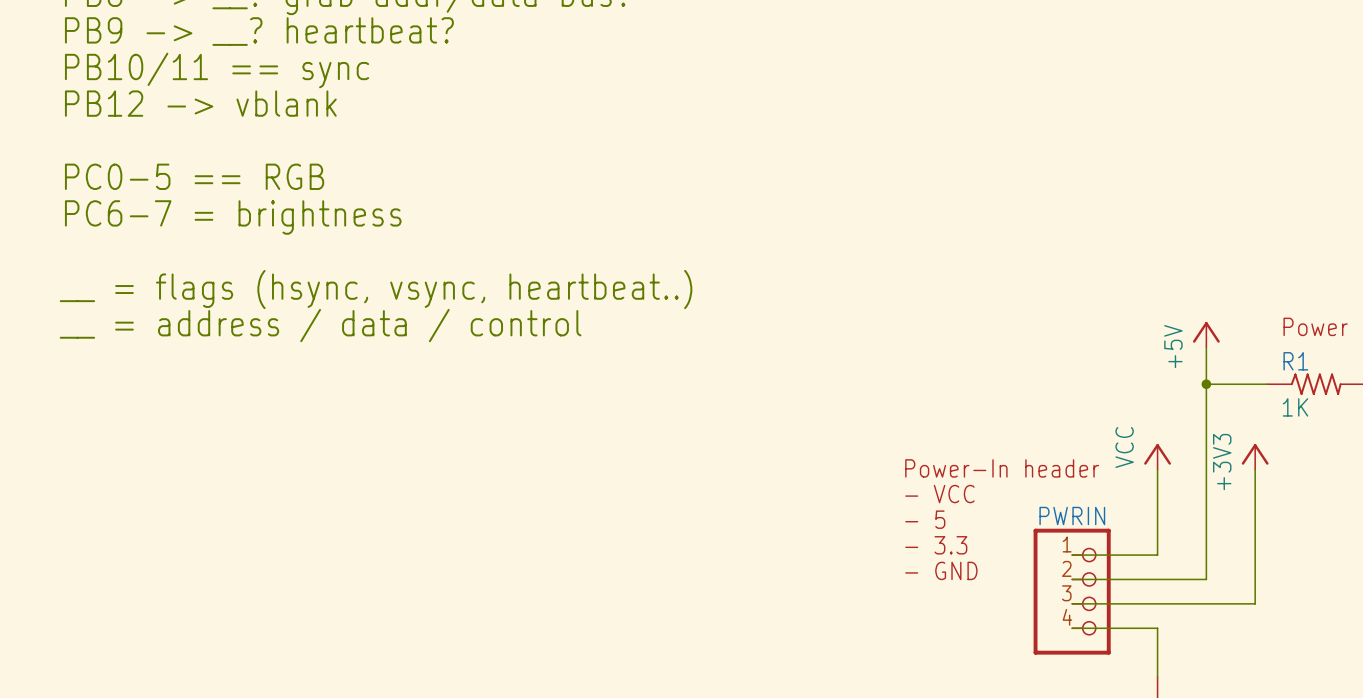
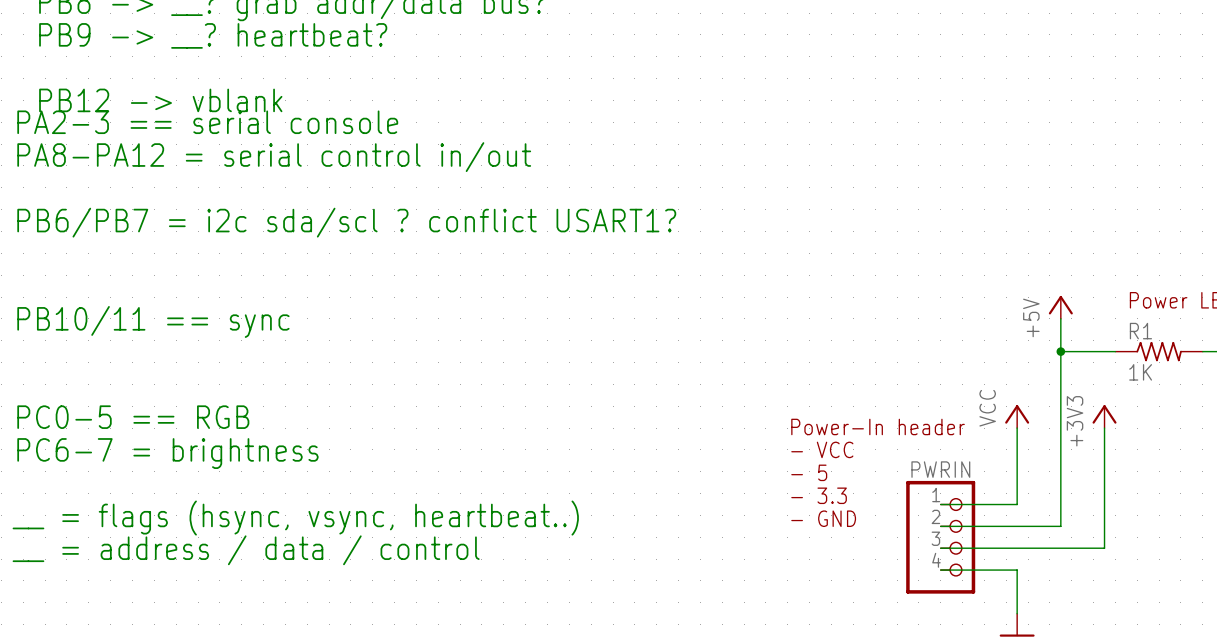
text: PB10/11 == sync (217, 70) -> none
text: none -> PA2-3 == serial console (207, 122)
text: none -> PA8-PA12 = serial control in/out (274, 157)
text: PC0-5 == RGB (194, 176) -> none
text: PC6-7 = brightness (233, 217) -> none
text: none -> PB6/PB7 = i2c sda/scl ? conflict USART1? (346, 222)
text: __ = flags (hsync, vsync, heartbeat..) (376, 289) -> none
text: __ = address / data / control (320, 325) -> none
text: none -> PB10/11 == sync (153, 321)
text: none -> PC0-5 == RGB (133, 417)
text: none -> PC6-7 = brightness (167, 453)
text: none -> __ = flags (hsync, vsync, heartbeat..) (295, 518)
text: none -> __ = address / data / control (246, 550)

